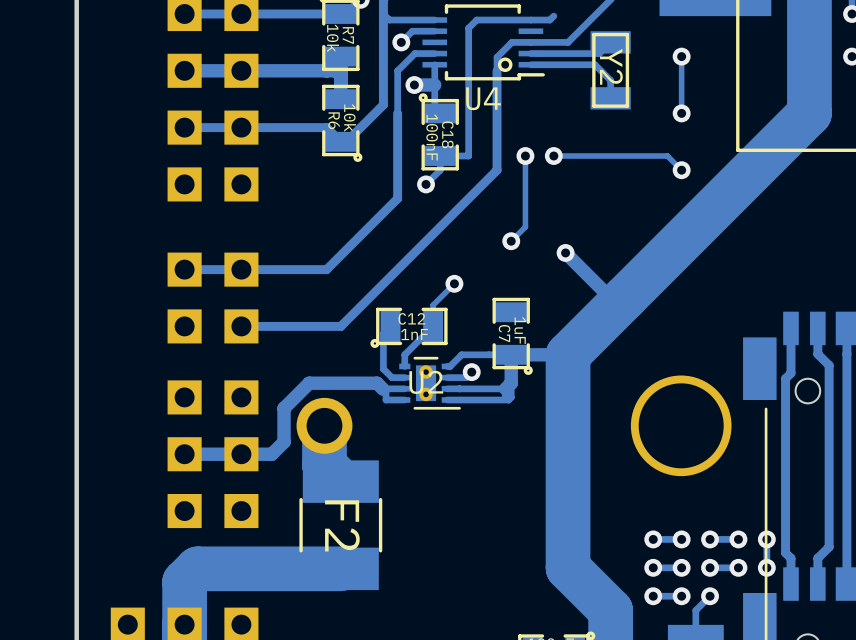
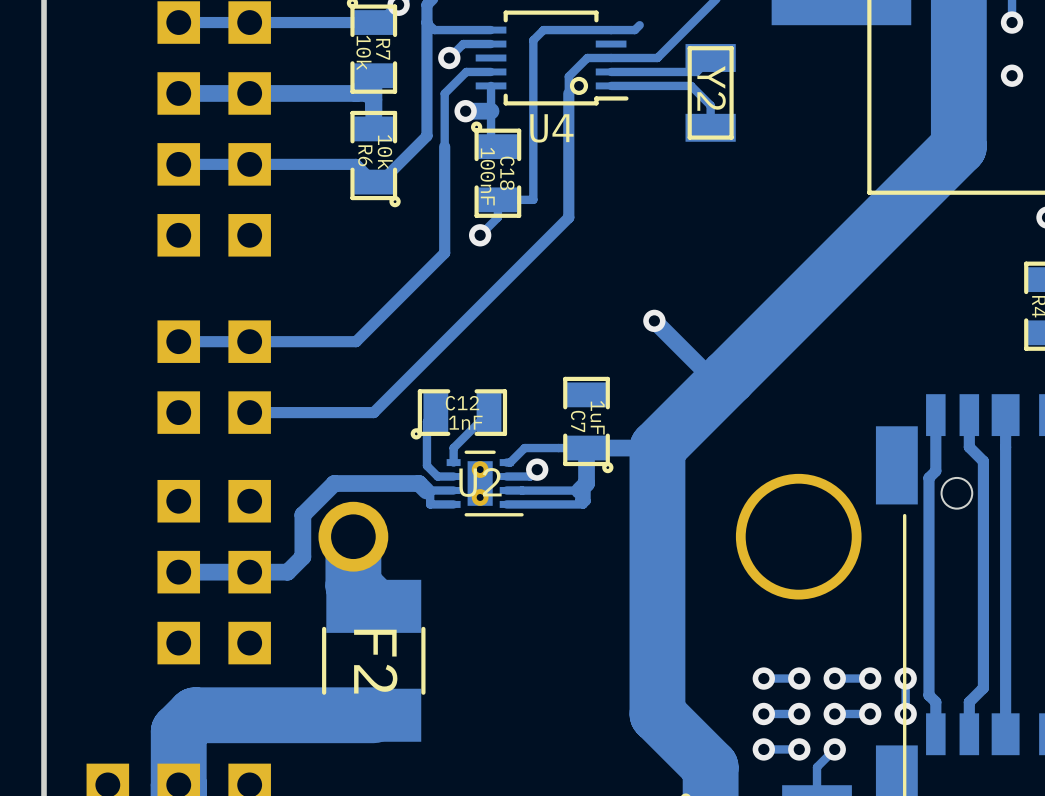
track: (681, 56) (681, 113) -> none
via: (681, 56) -> none
via: (681, 113) -> none
track: (525, 156) (525, 227) (511, 241) -> none
via: (525, 156) -> none
track: (553, 156) (667, 156) (681, 170) -> none
via: (553, 156) -> none
via: (681, 170) -> none
via: (511, 241) -> none
track: (454, 283) (433, 305) (433, 326) -> none
via: (454, 283) -> none

